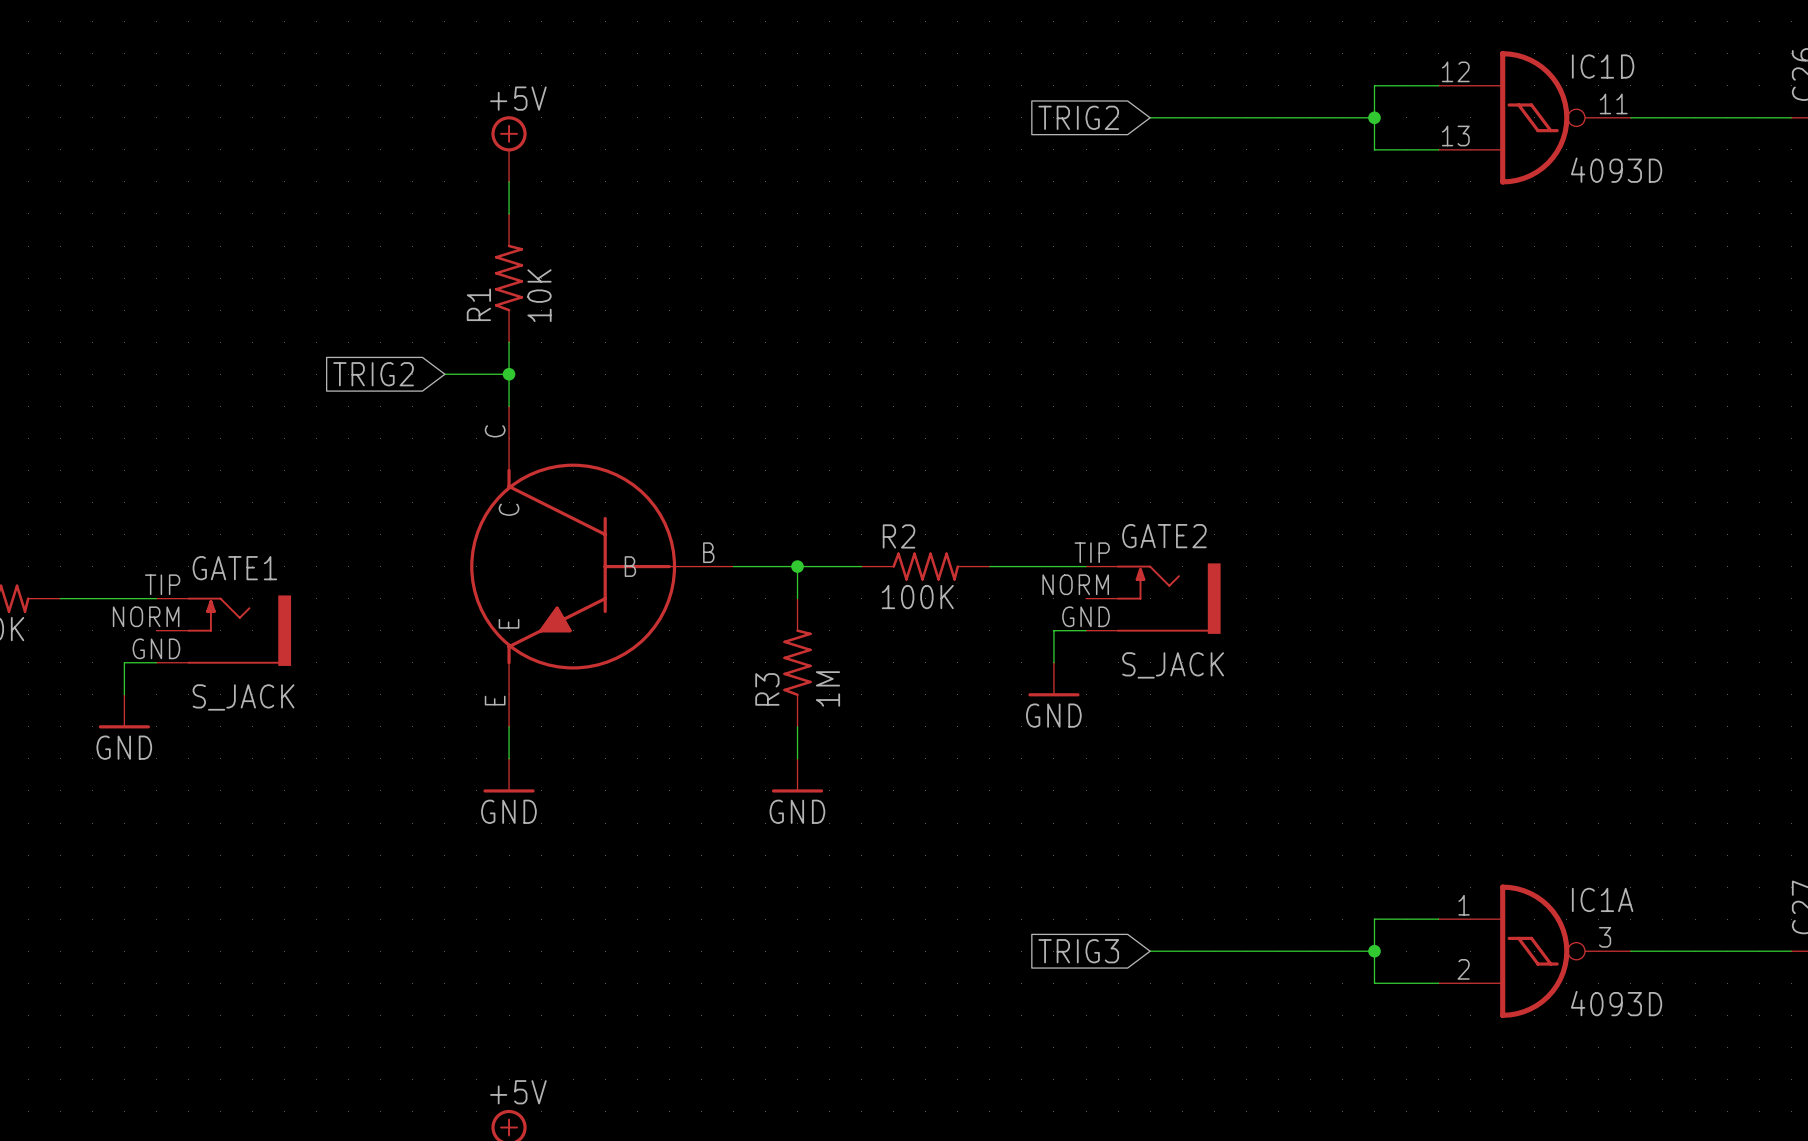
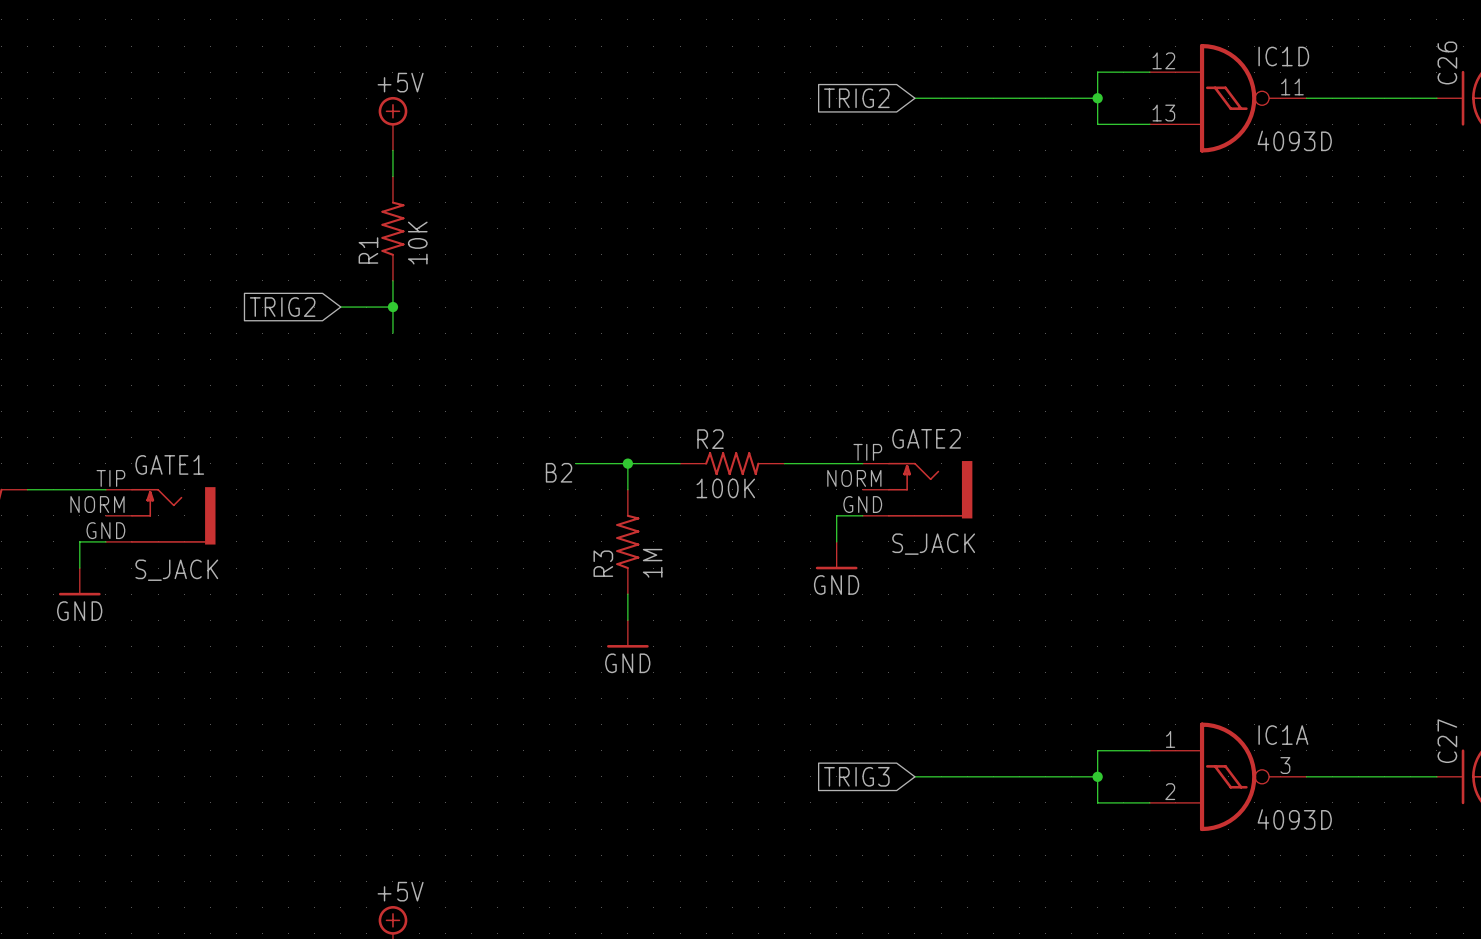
part: (601, 566) -> none
label: none -> B2 (559, 472)
wire: (509, 726) (509, 758) -> none
power symbol: GND (509, 775) -> none

